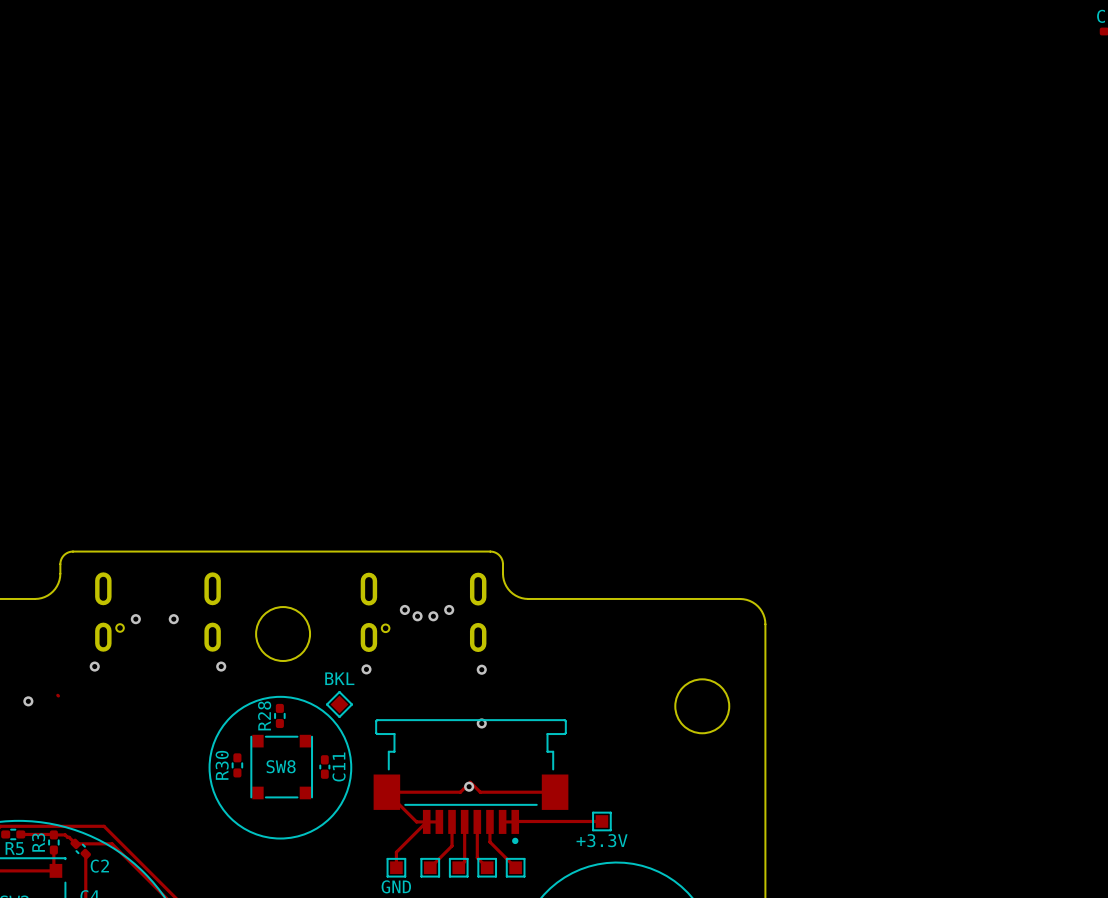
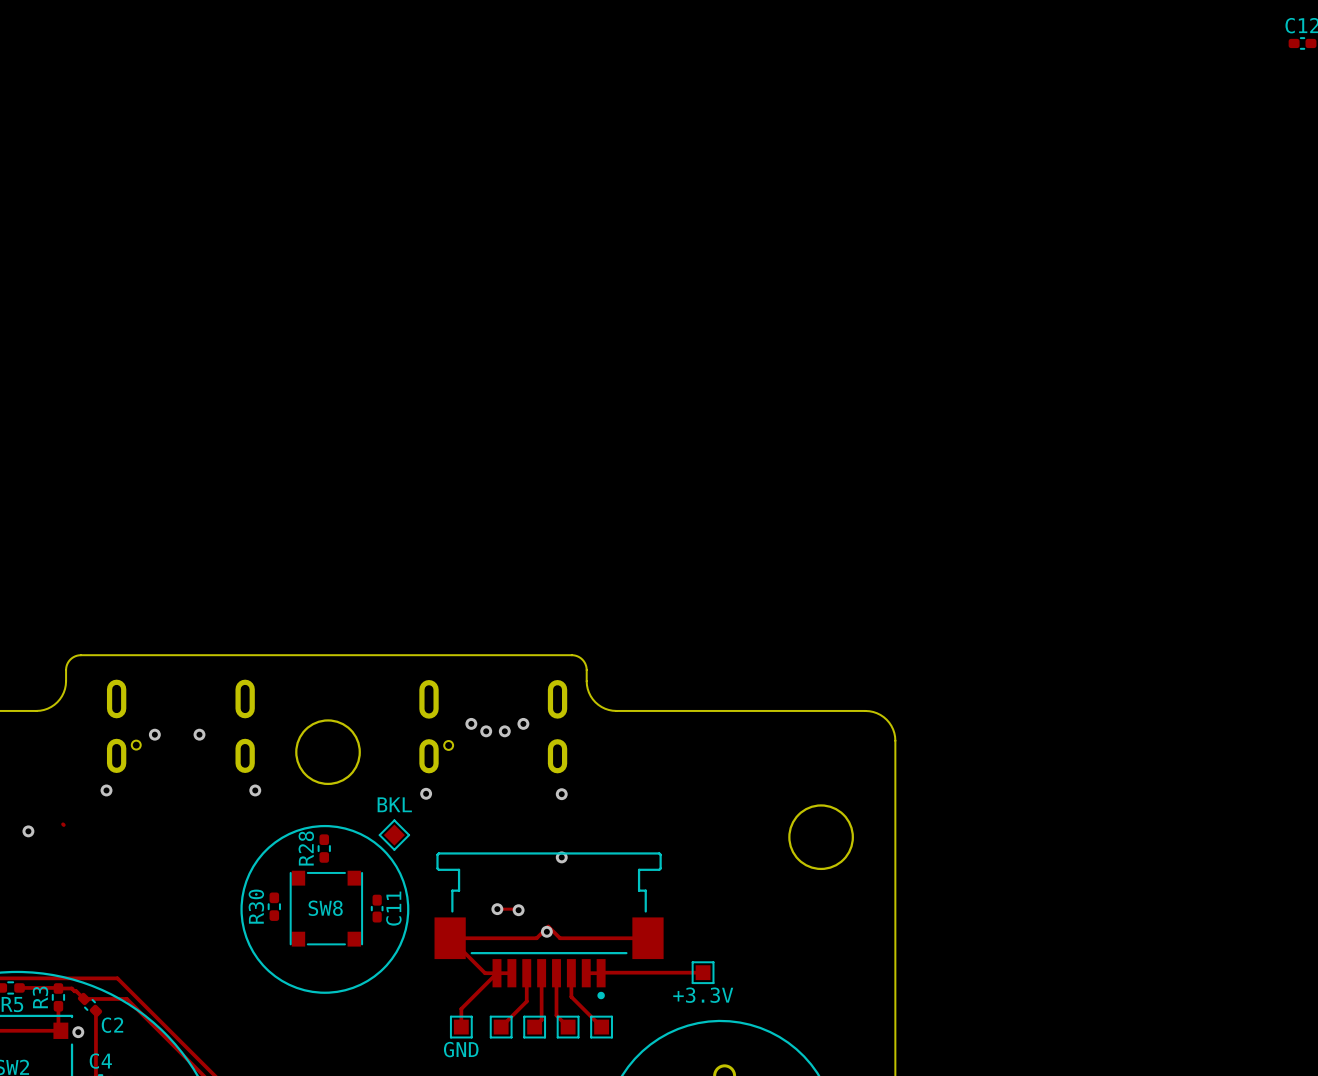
track: none -> (497, 909) (518, 910)
via: none -> (497, 909)
via: none -> (518, 910)
via: none -> (78, 1032)

